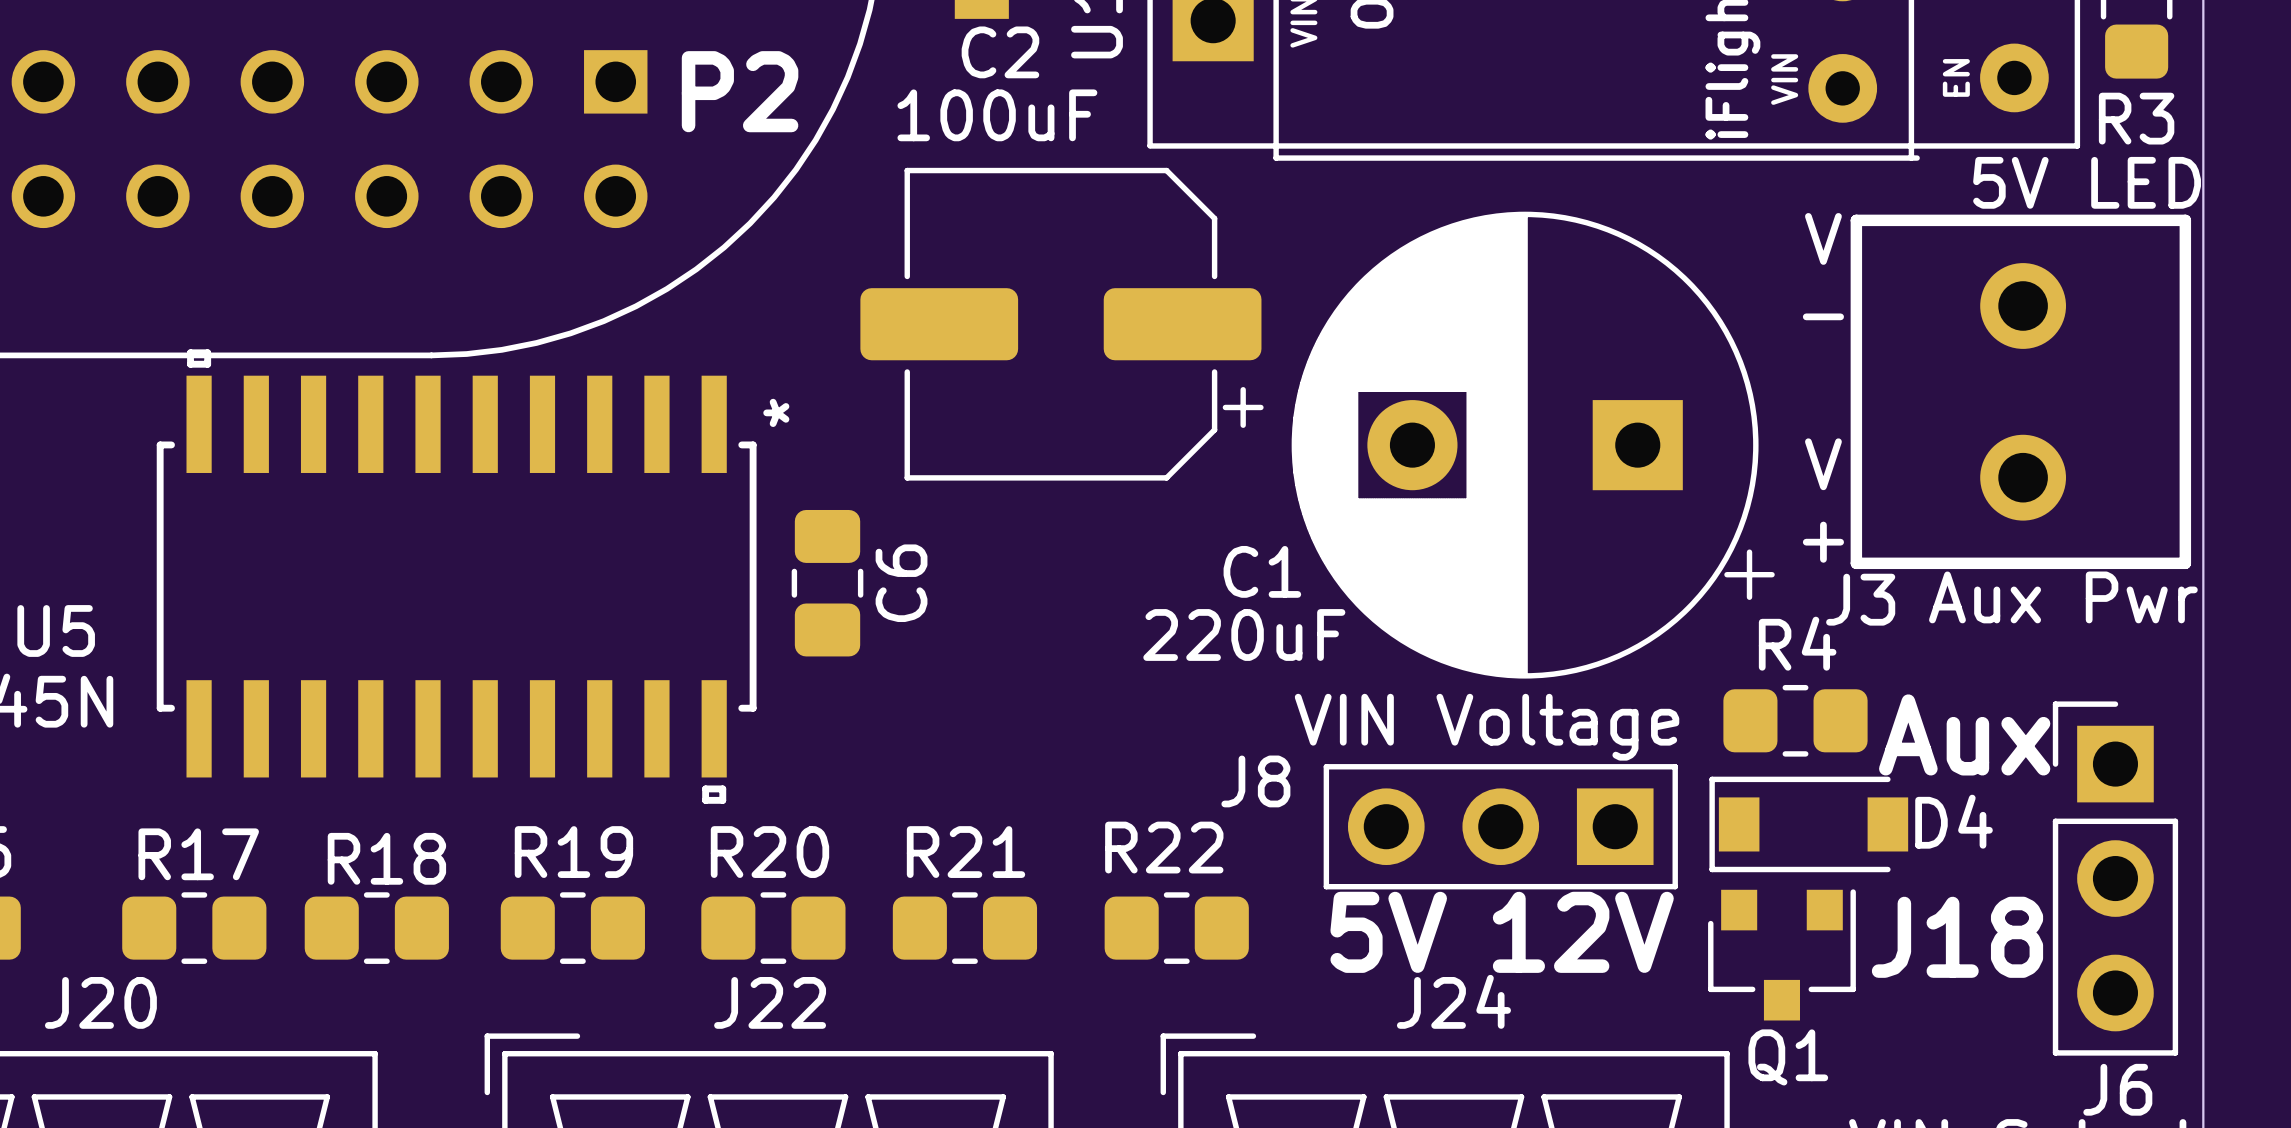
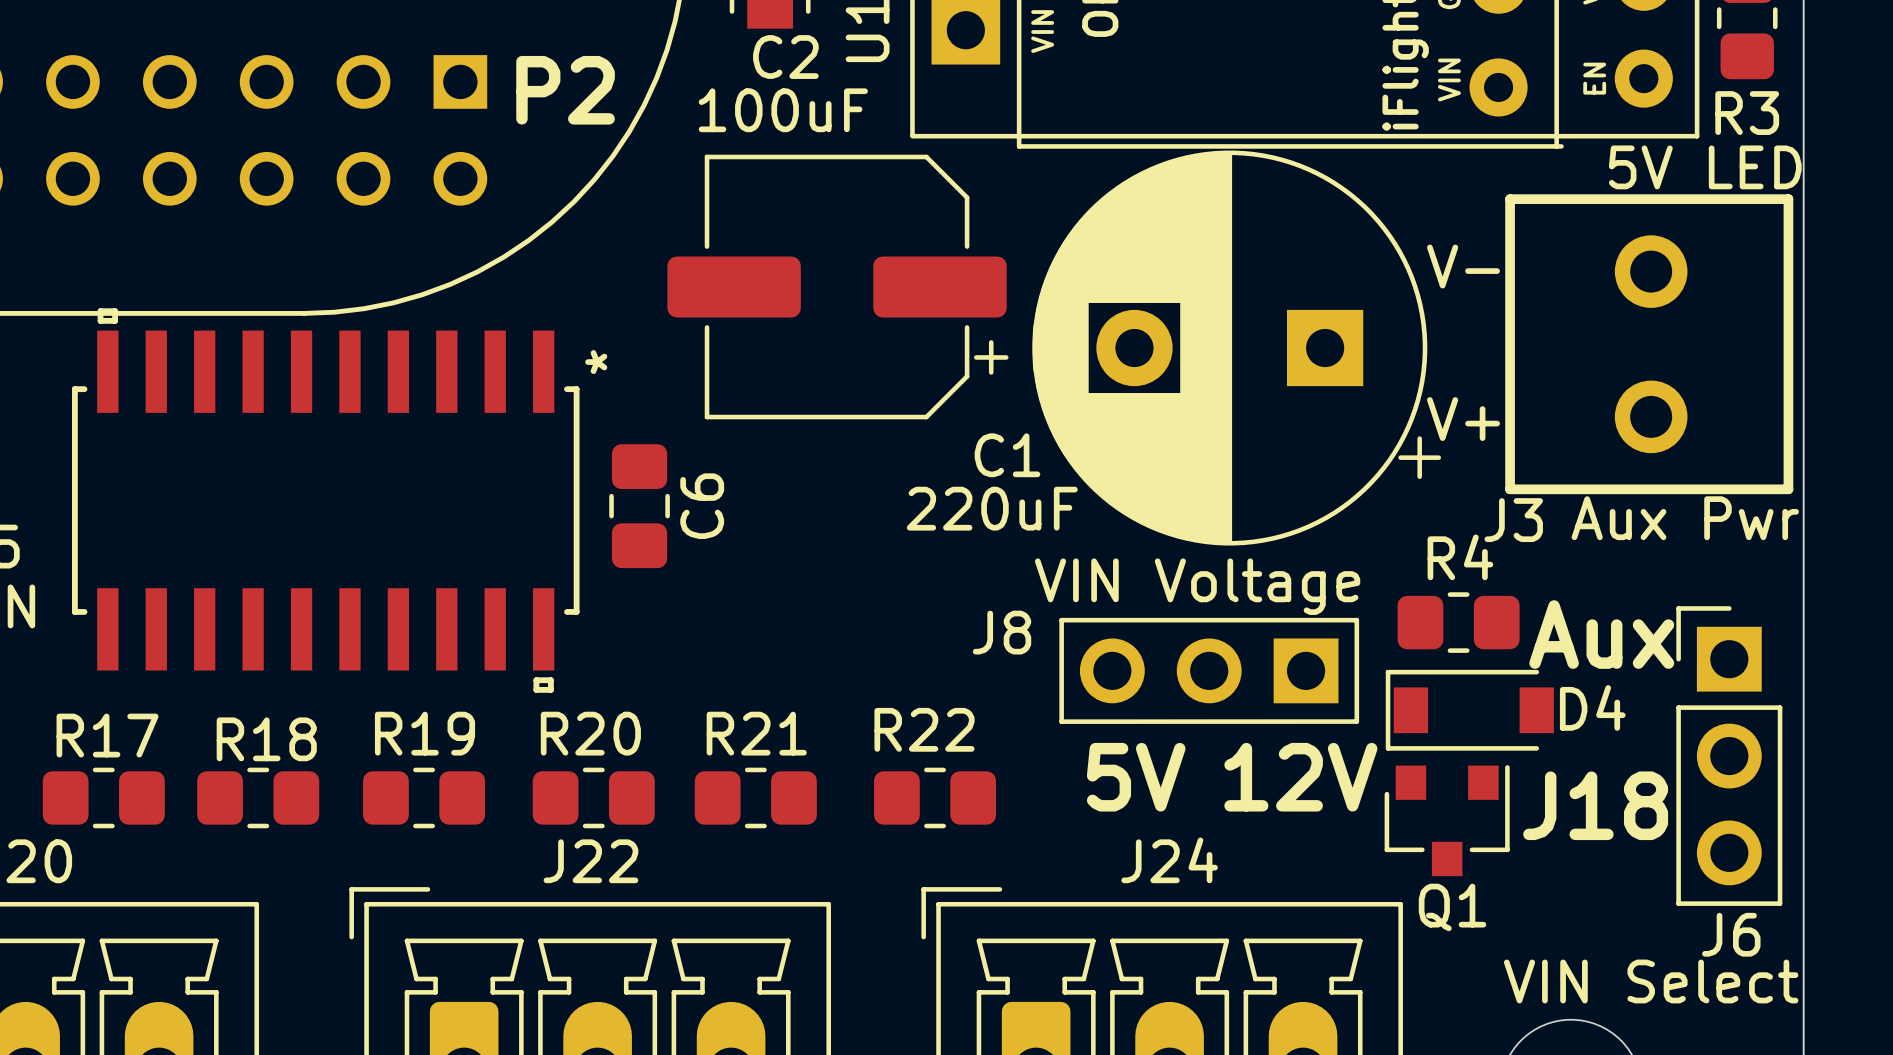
text: V (1823, 238) -> none
text: - (1823, 316) -> V- (1463, 266)
C1 position: (1533, 445) -> (1236, 348)
text: V (1823, 464) -> V+ (1463, 419)
text: + (1823, 542) -> none
J8 position: (1500, 826) -> (1209, 670)
text position: 5V (1388, 932) -> 5V (1136, 777)
text position: 12V (1583, 932) -> 12V (1300, 777)

